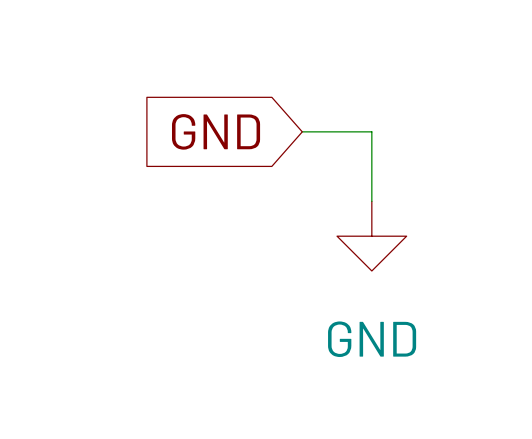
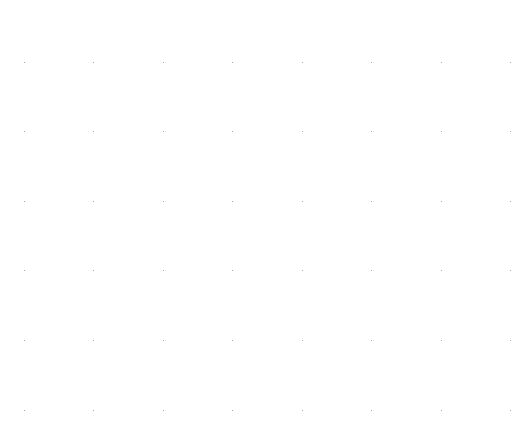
global label: GND (216, 131) -> none
wire: (302, 131) (371, 131) (371, 201) -> none
power symbol: GND (371, 236) -> none

